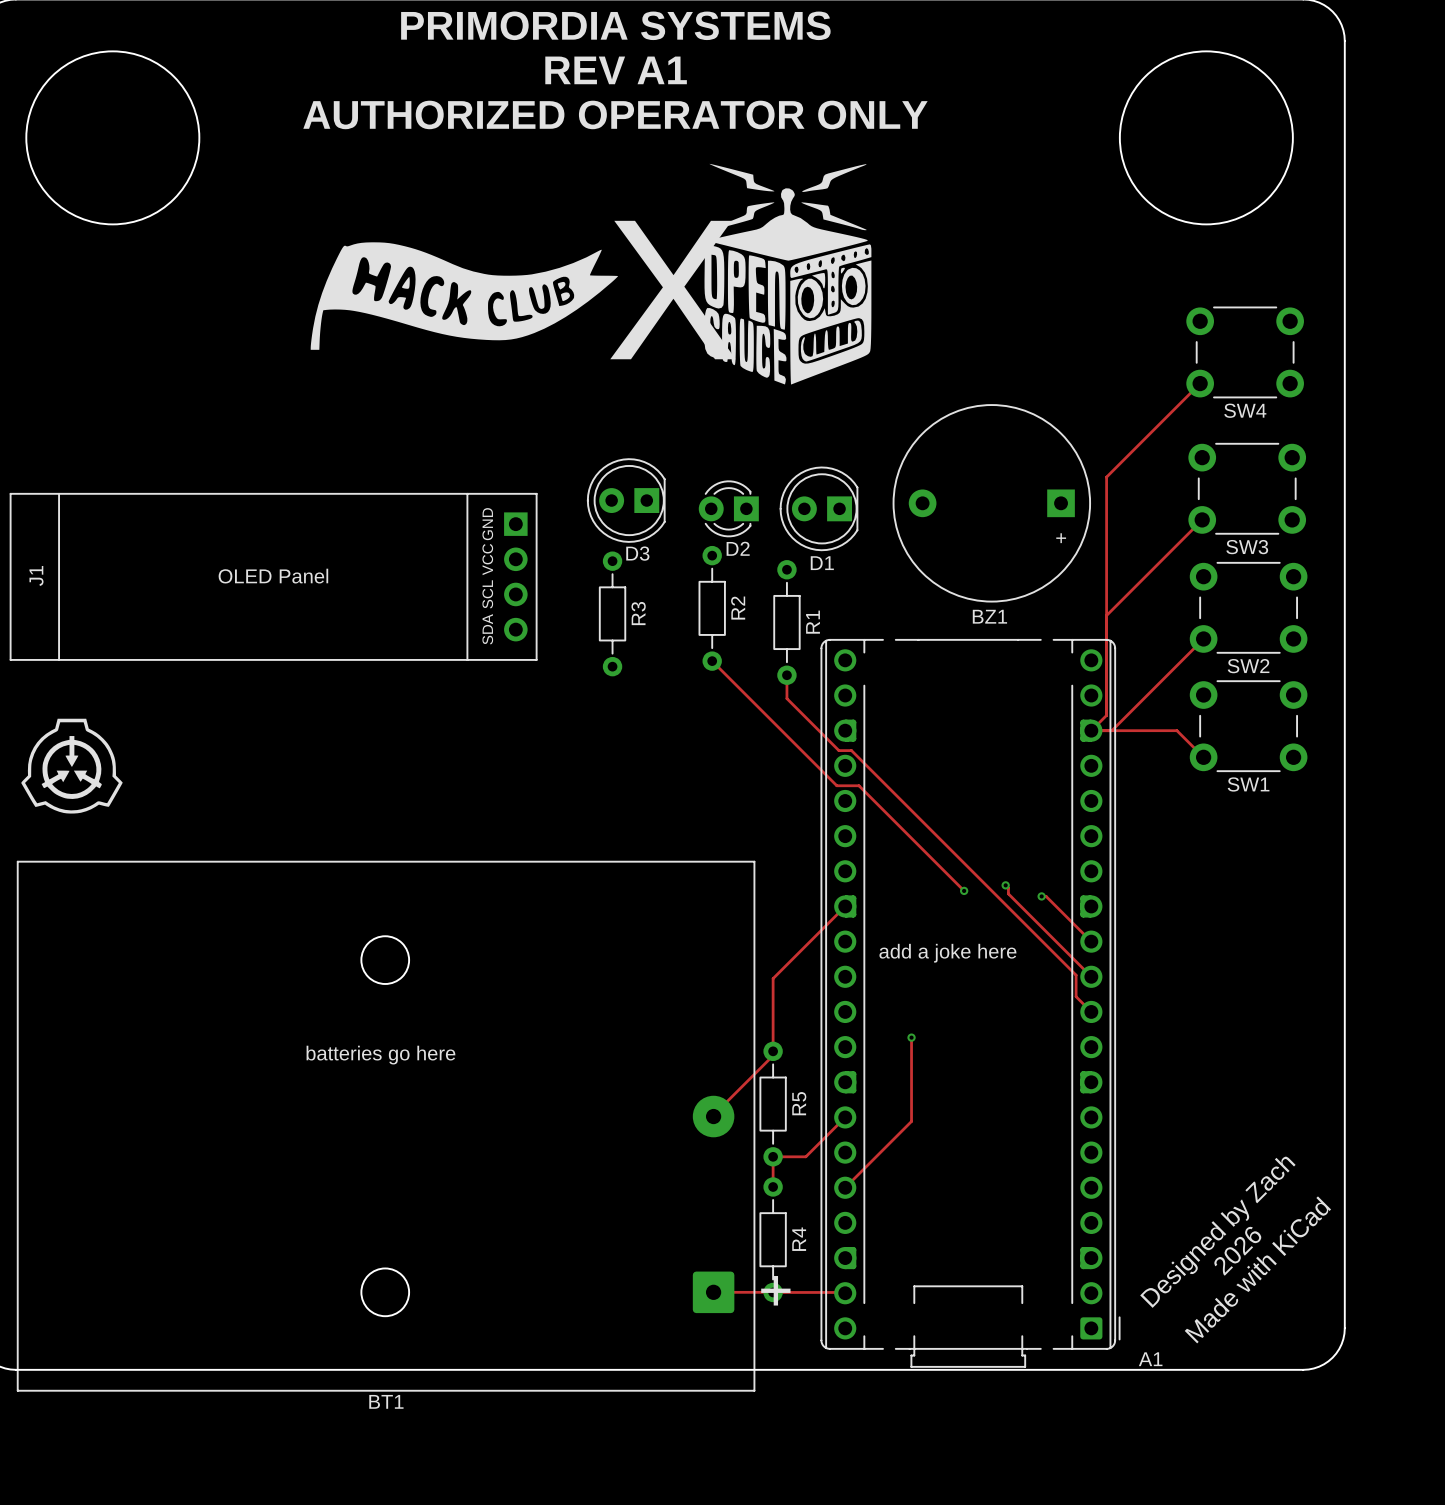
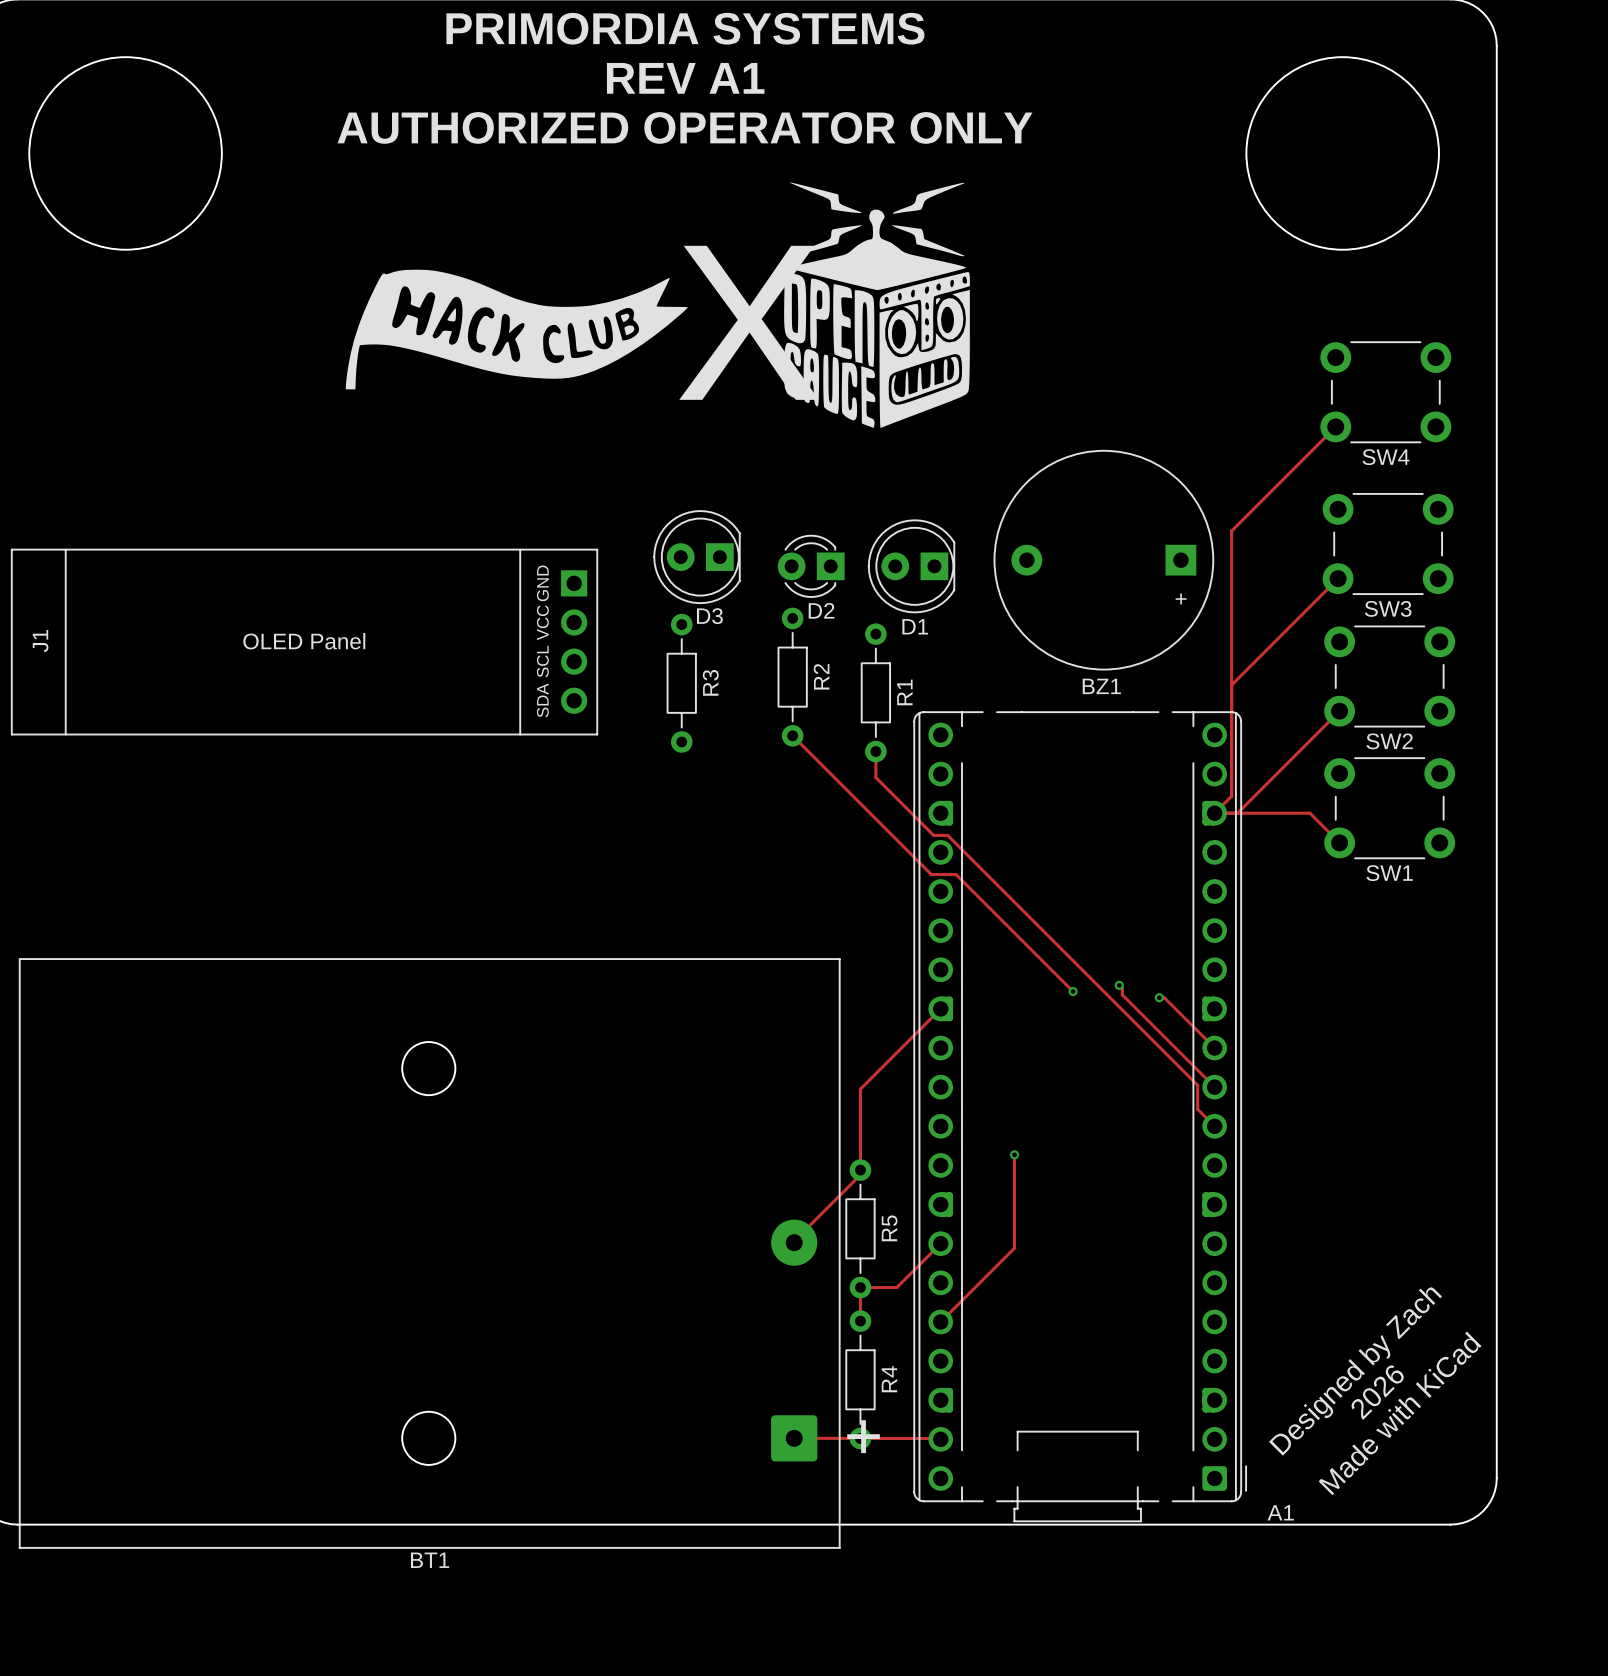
drawing: [21, 718, 123, 814] -> none
text: add a joke here (947, 953) -> none
text: batteries go here (380, 1055) -> none

